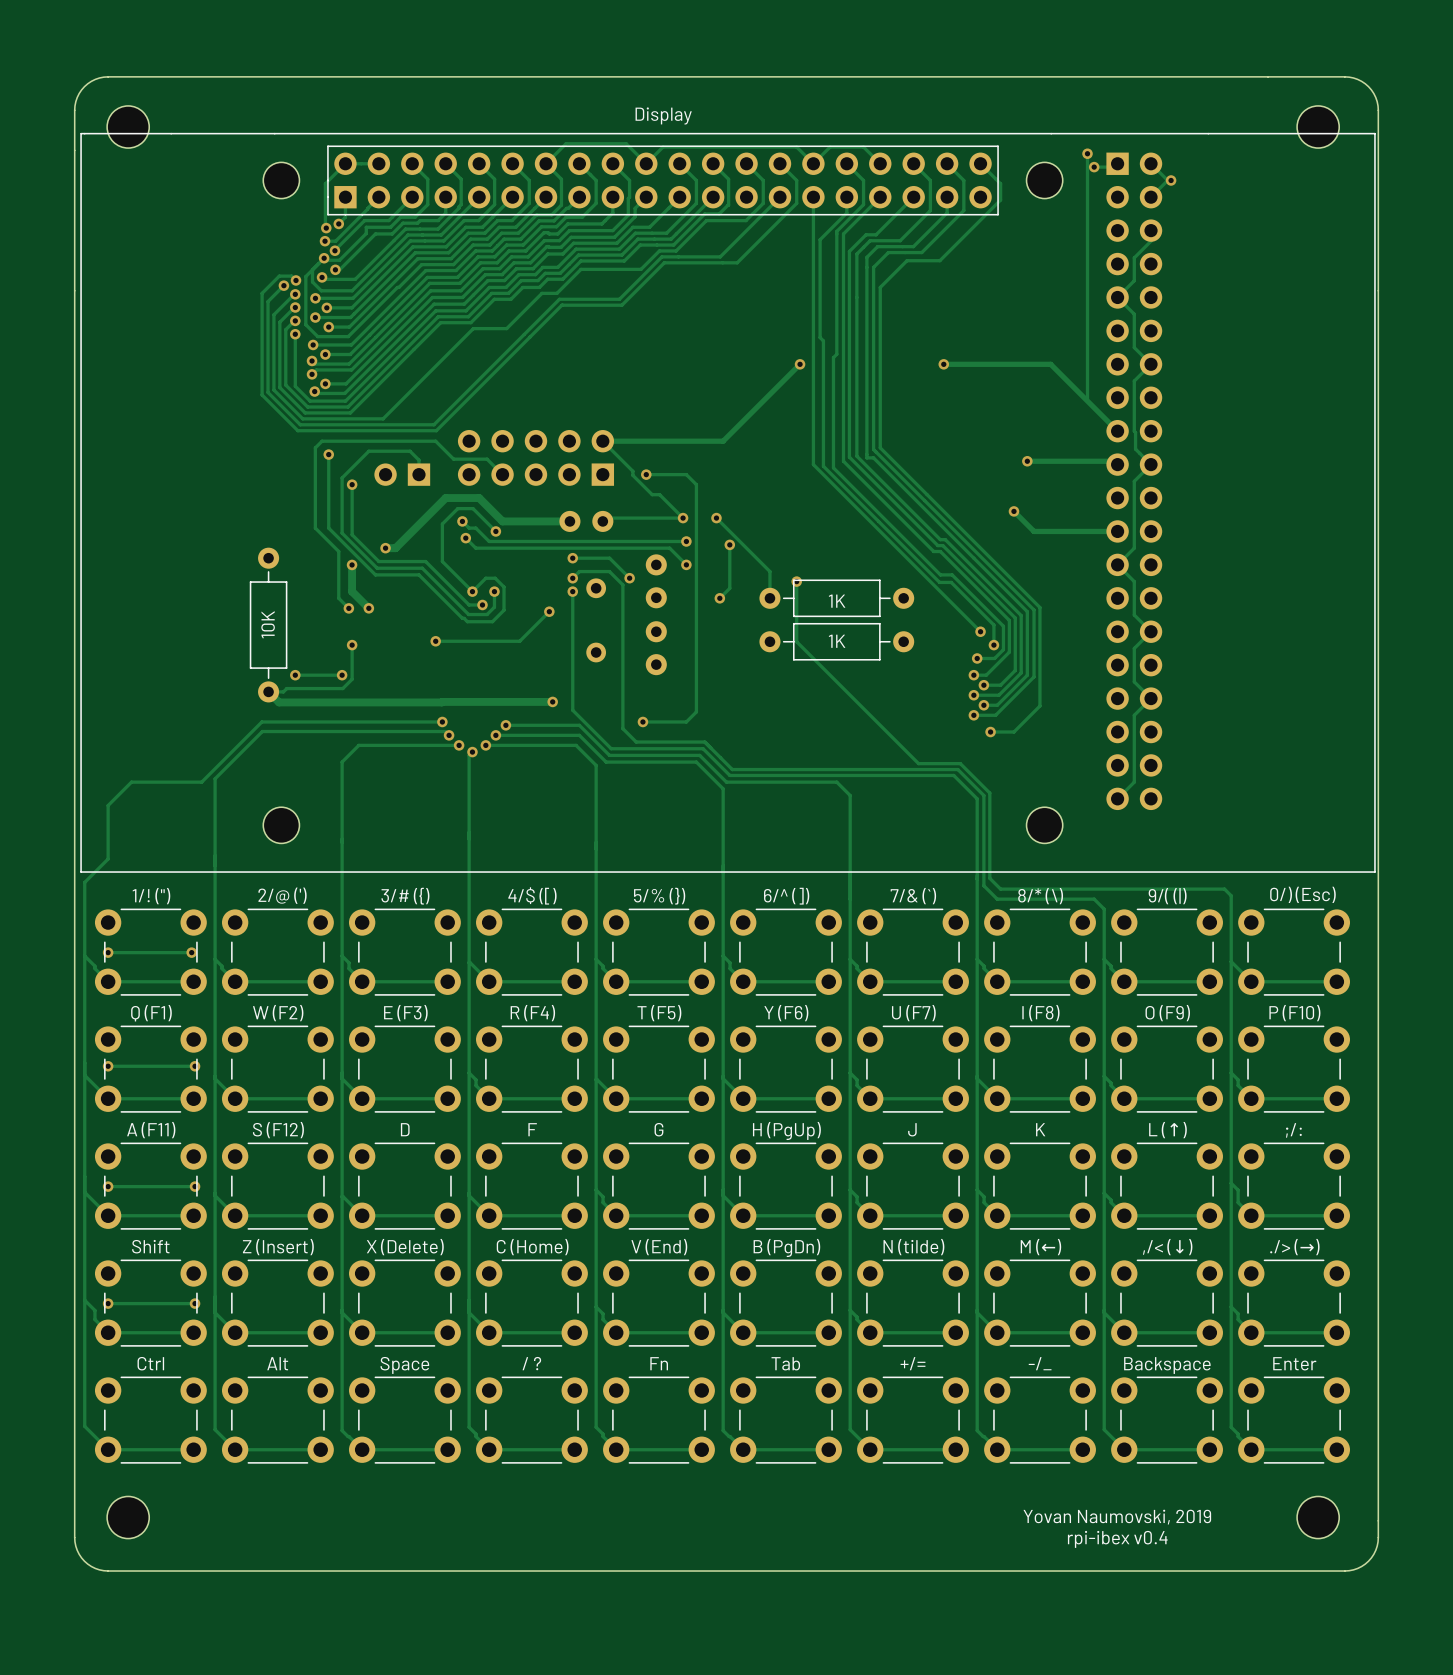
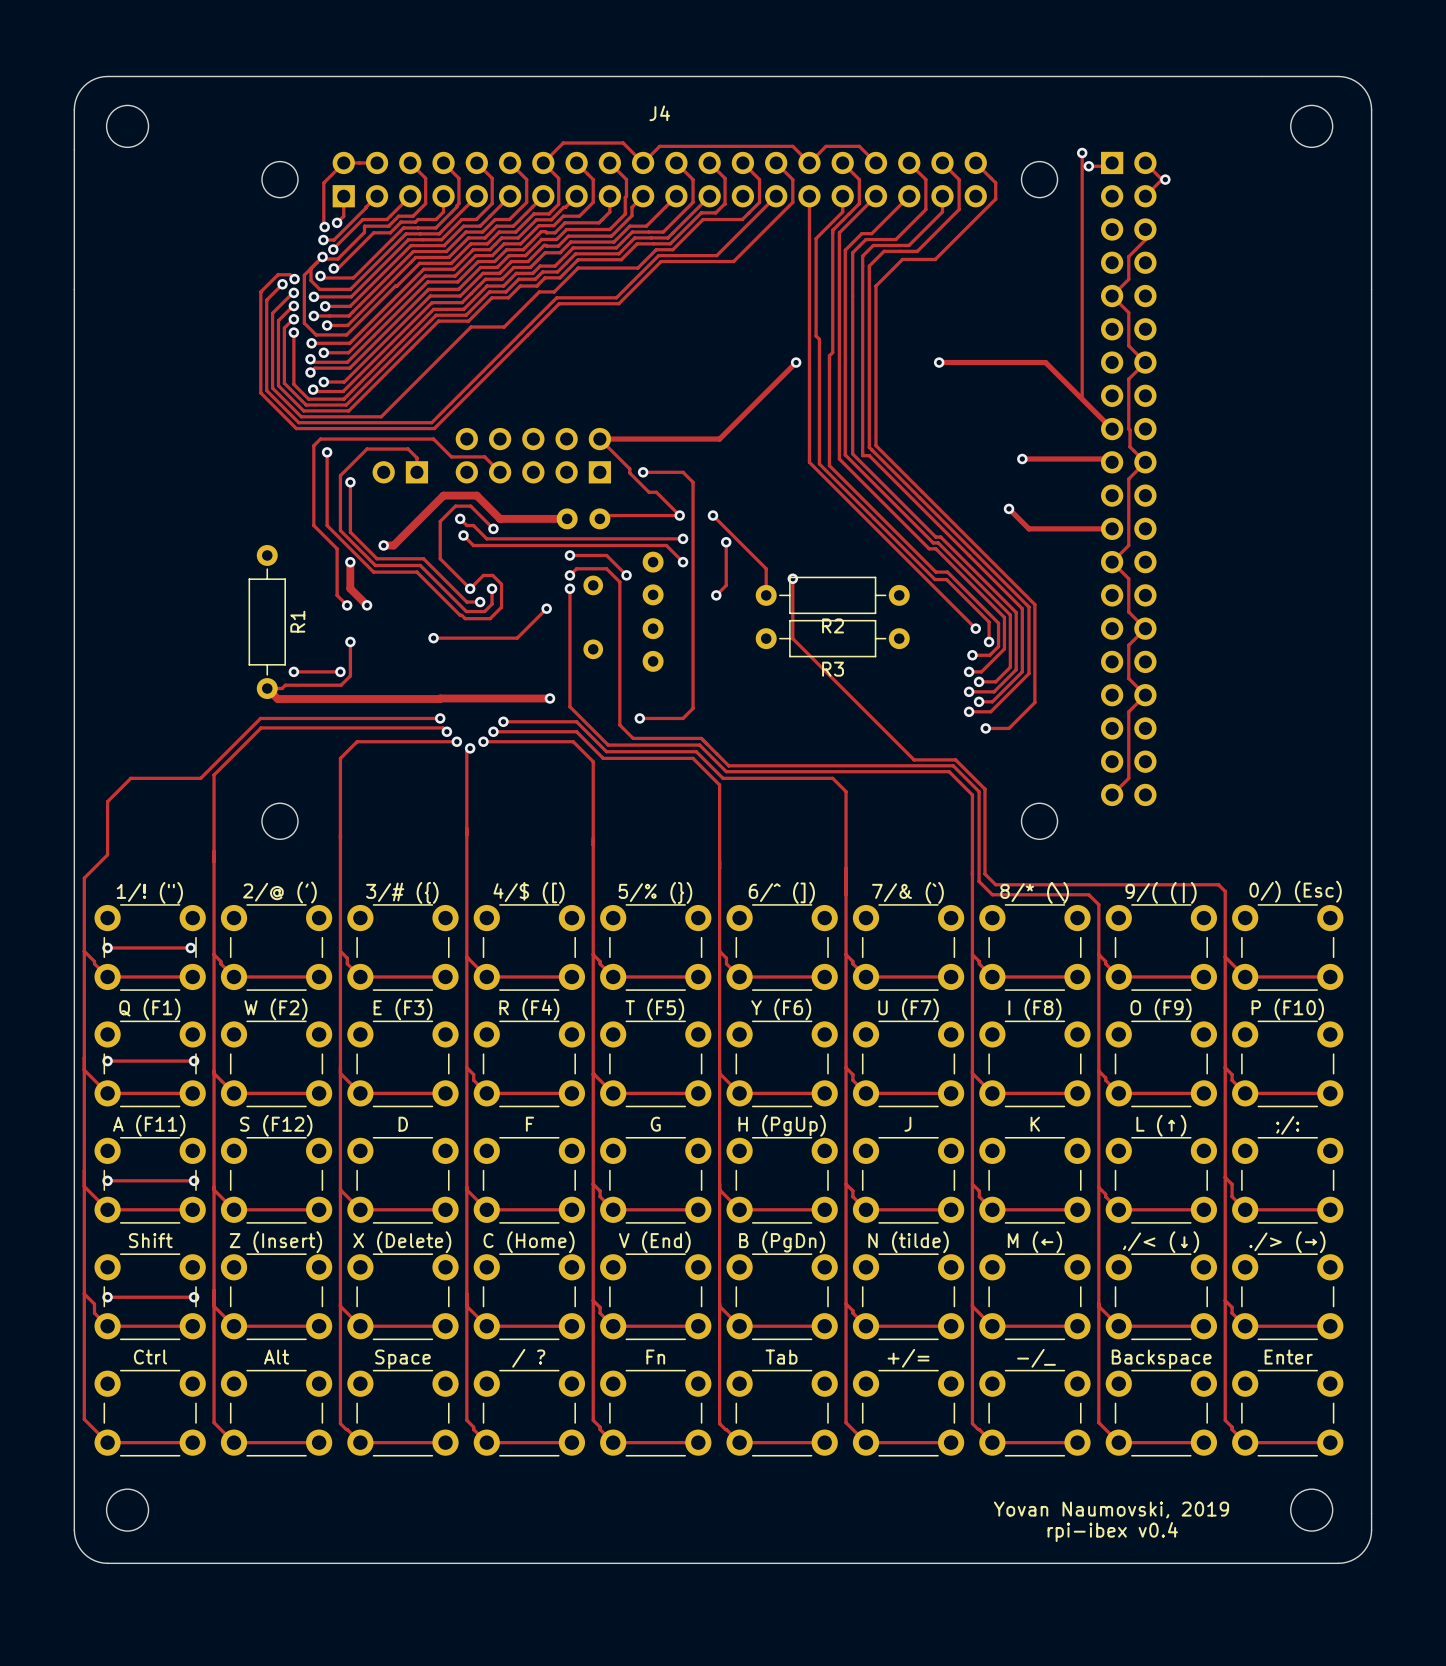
J4: none -> (659, 495)
Display: (728, 502) -> none
1K name: 1K (837, 601) -> R2 (833, 625)
10K name: 10K (268, 624) -> R1 (297, 621)
1K name: 1K (837, 641) -> R3 (833, 669)

